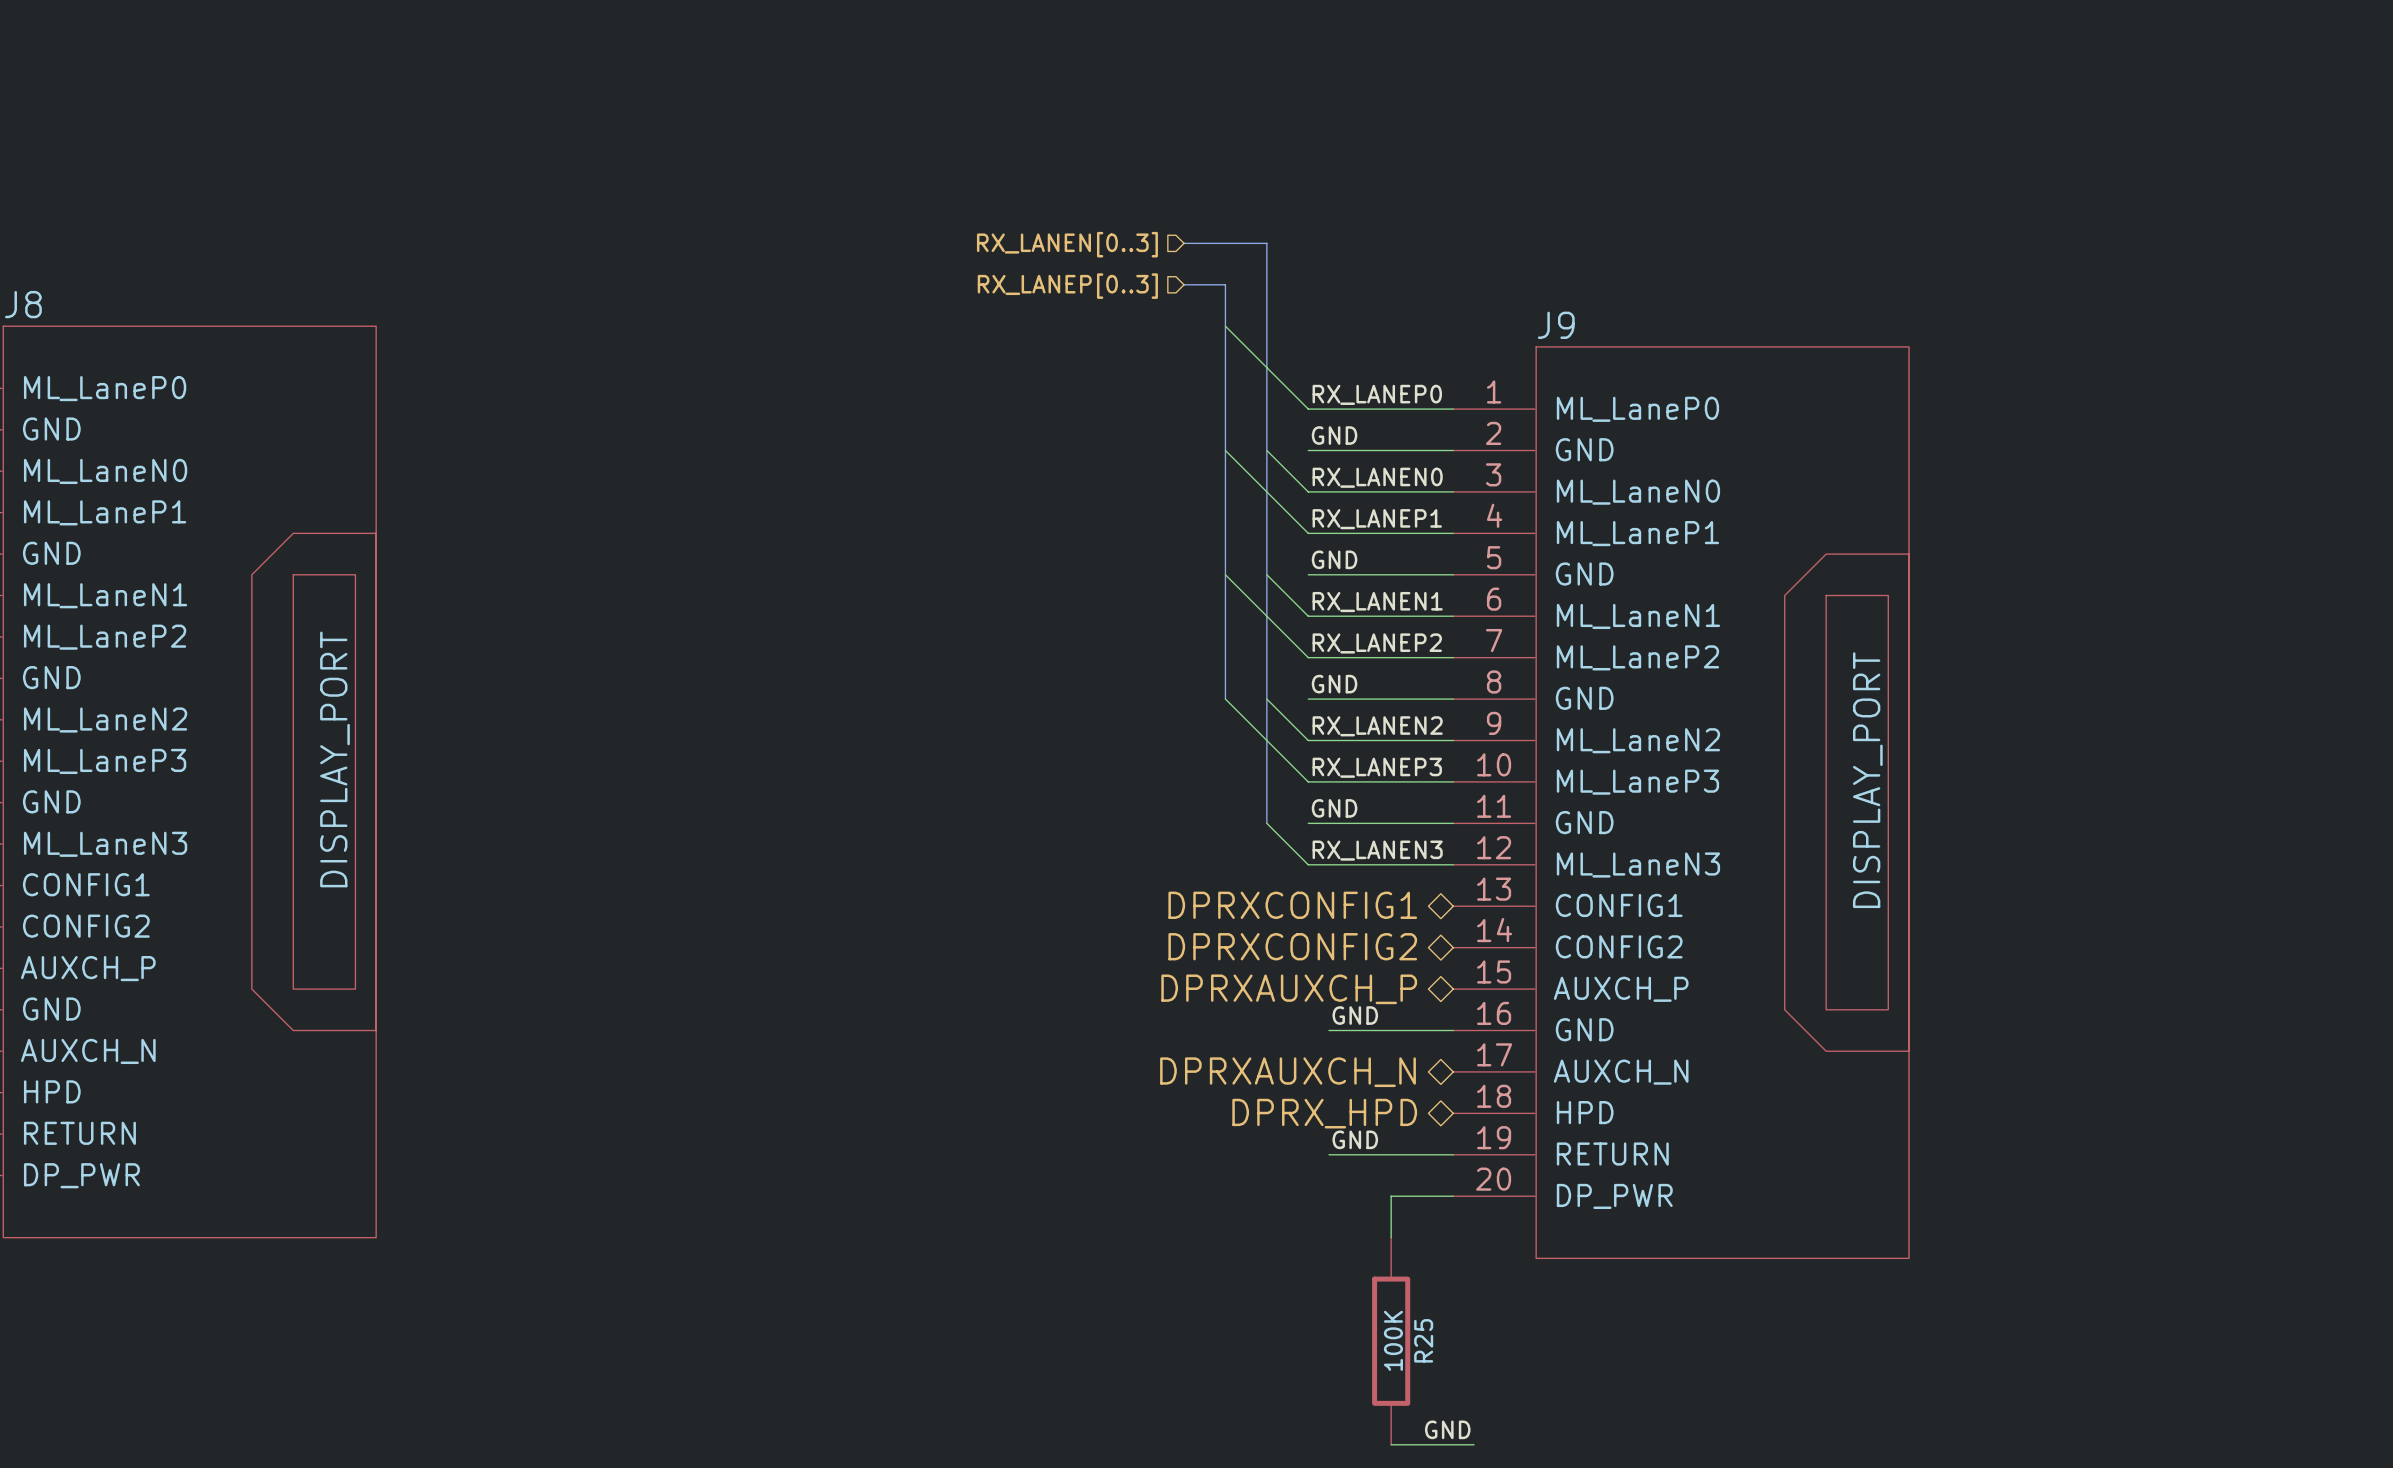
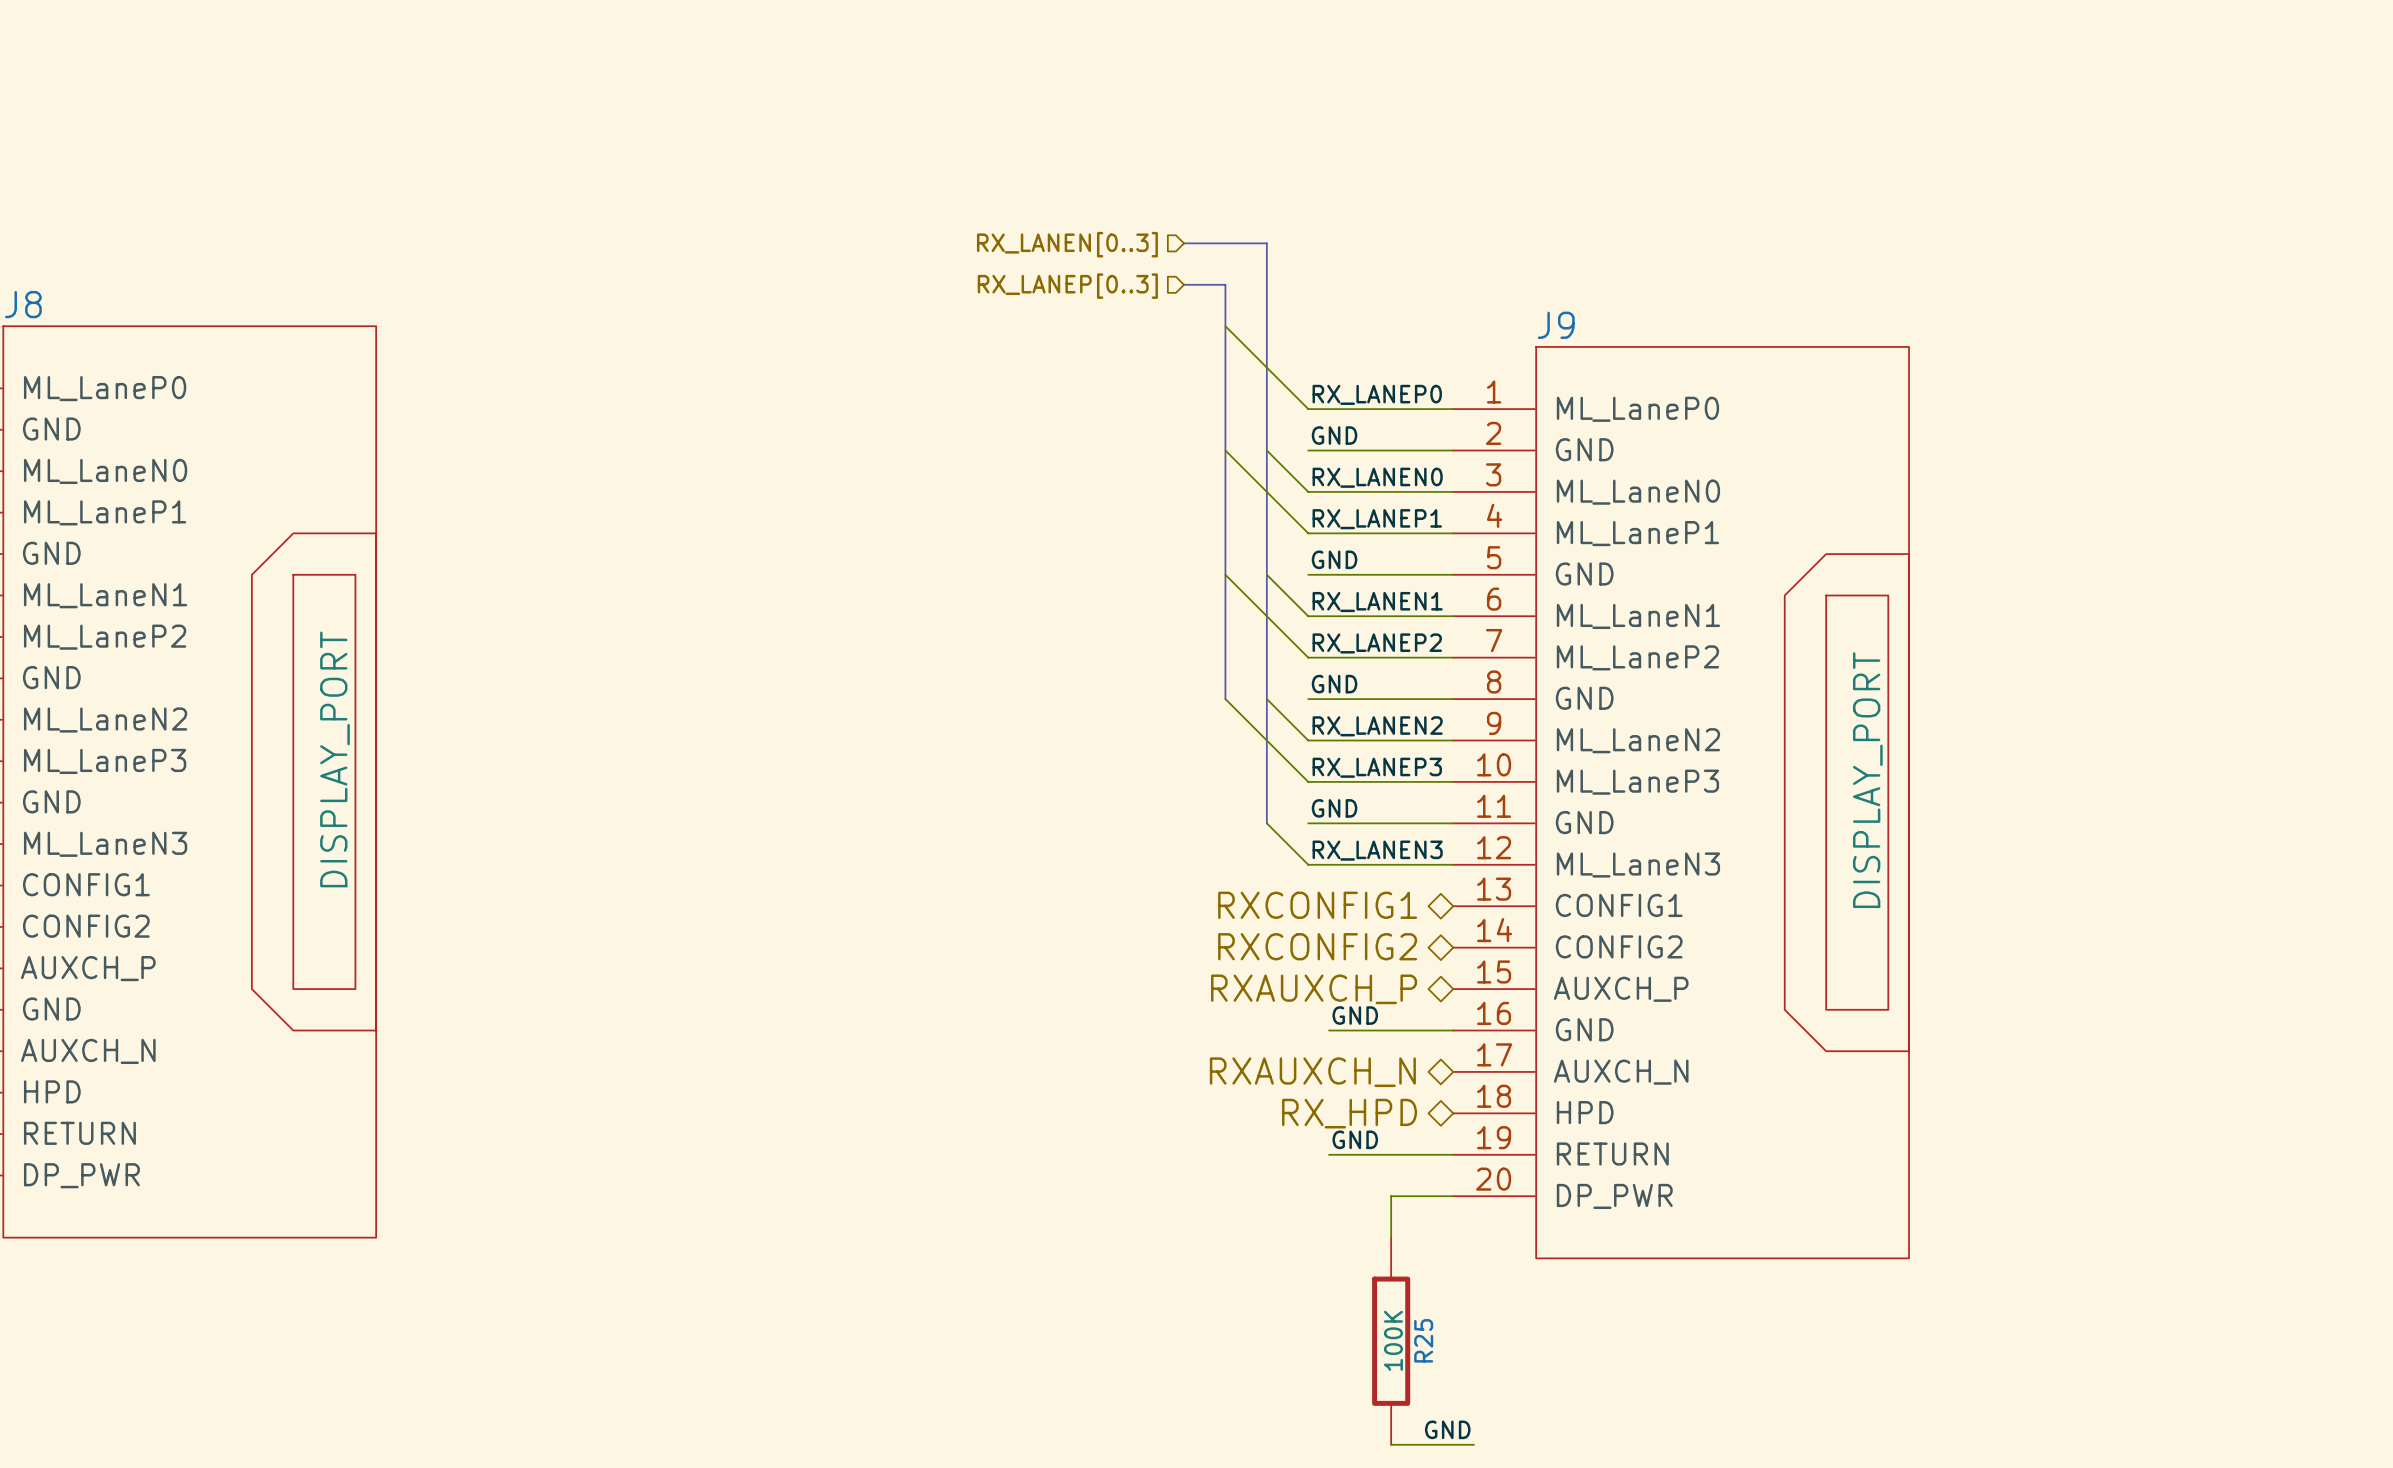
hierarchical label: DPRXCONFIG1 (1292, 905) -> RXCONFIG1 (1317, 905)
hierarchical label: DPRXCONFIG2 (1292, 946) -> RXCONFIG2 (1317, 946)
hierarchical label: DPRXAUXCH_P (1289, 989) -> RXAUXCH_P (1314, 989)
hierarchical label: DPRXAUXCH_N (1288, 1072) -> RXAUXCH_N (1312, 1072)
hierarchical label: DPRX_HPD (1324, 1113) -> RX_HPD (1349, 1113)

